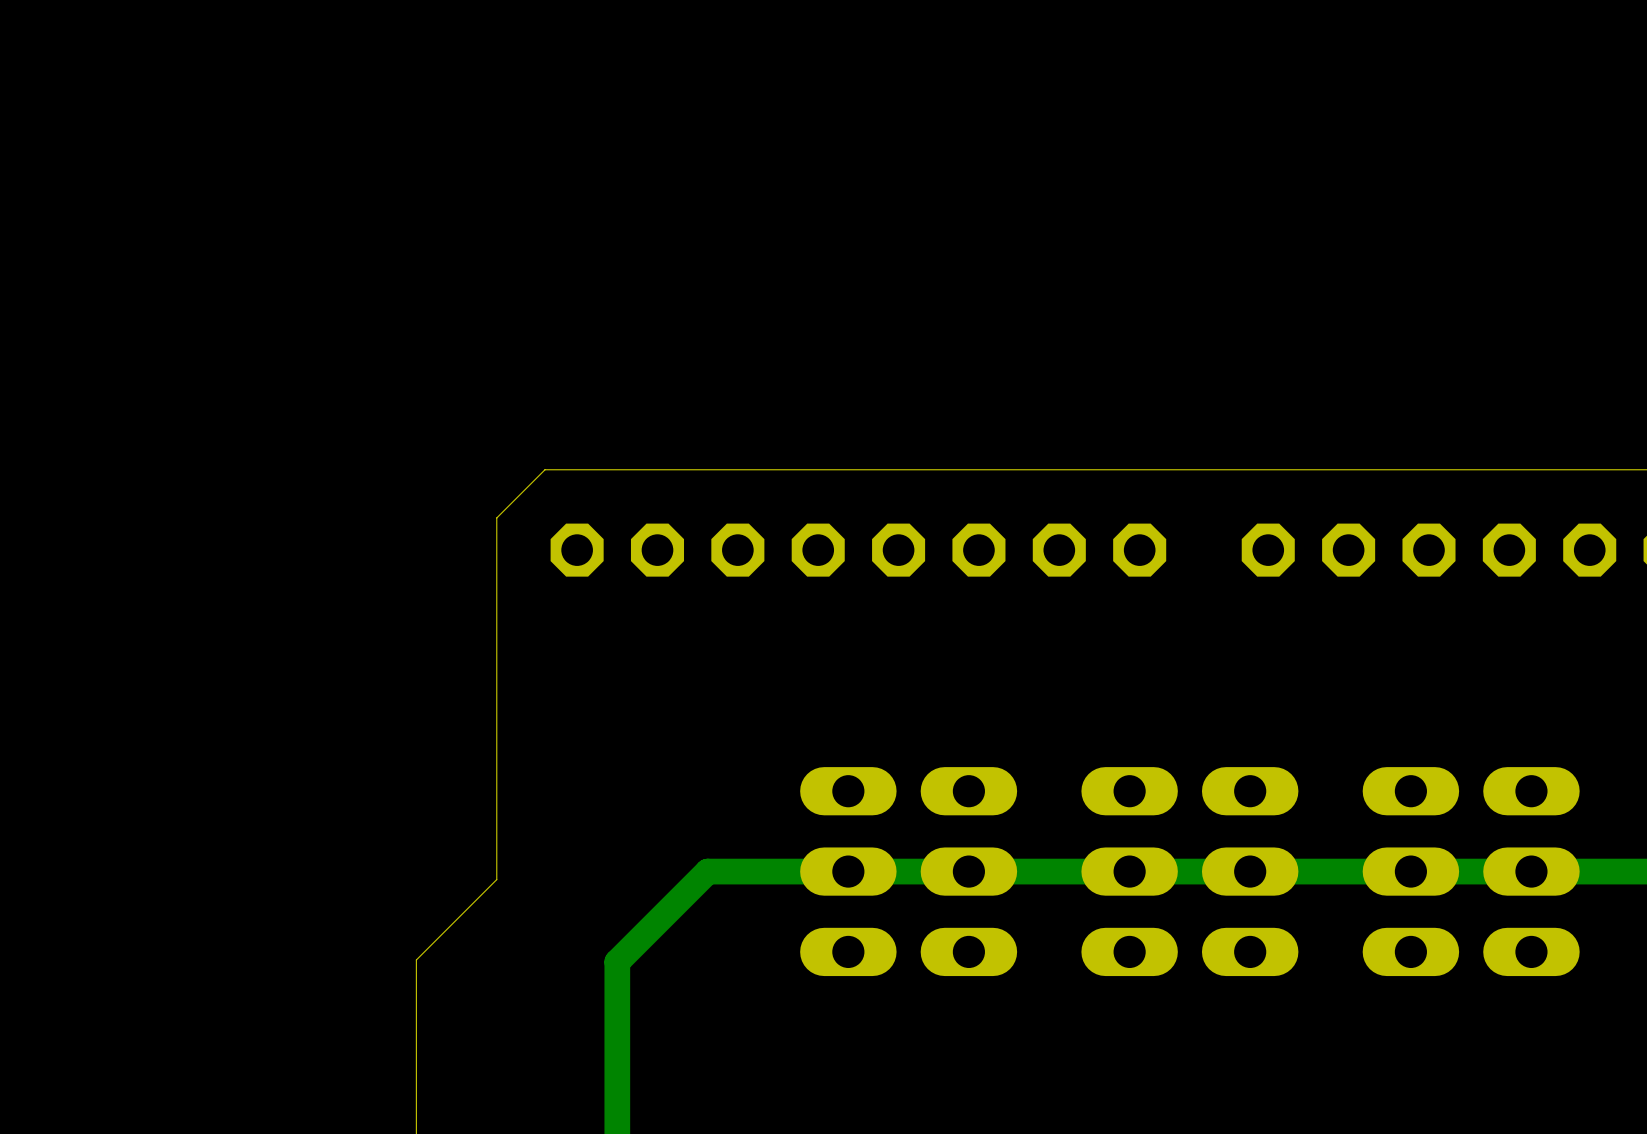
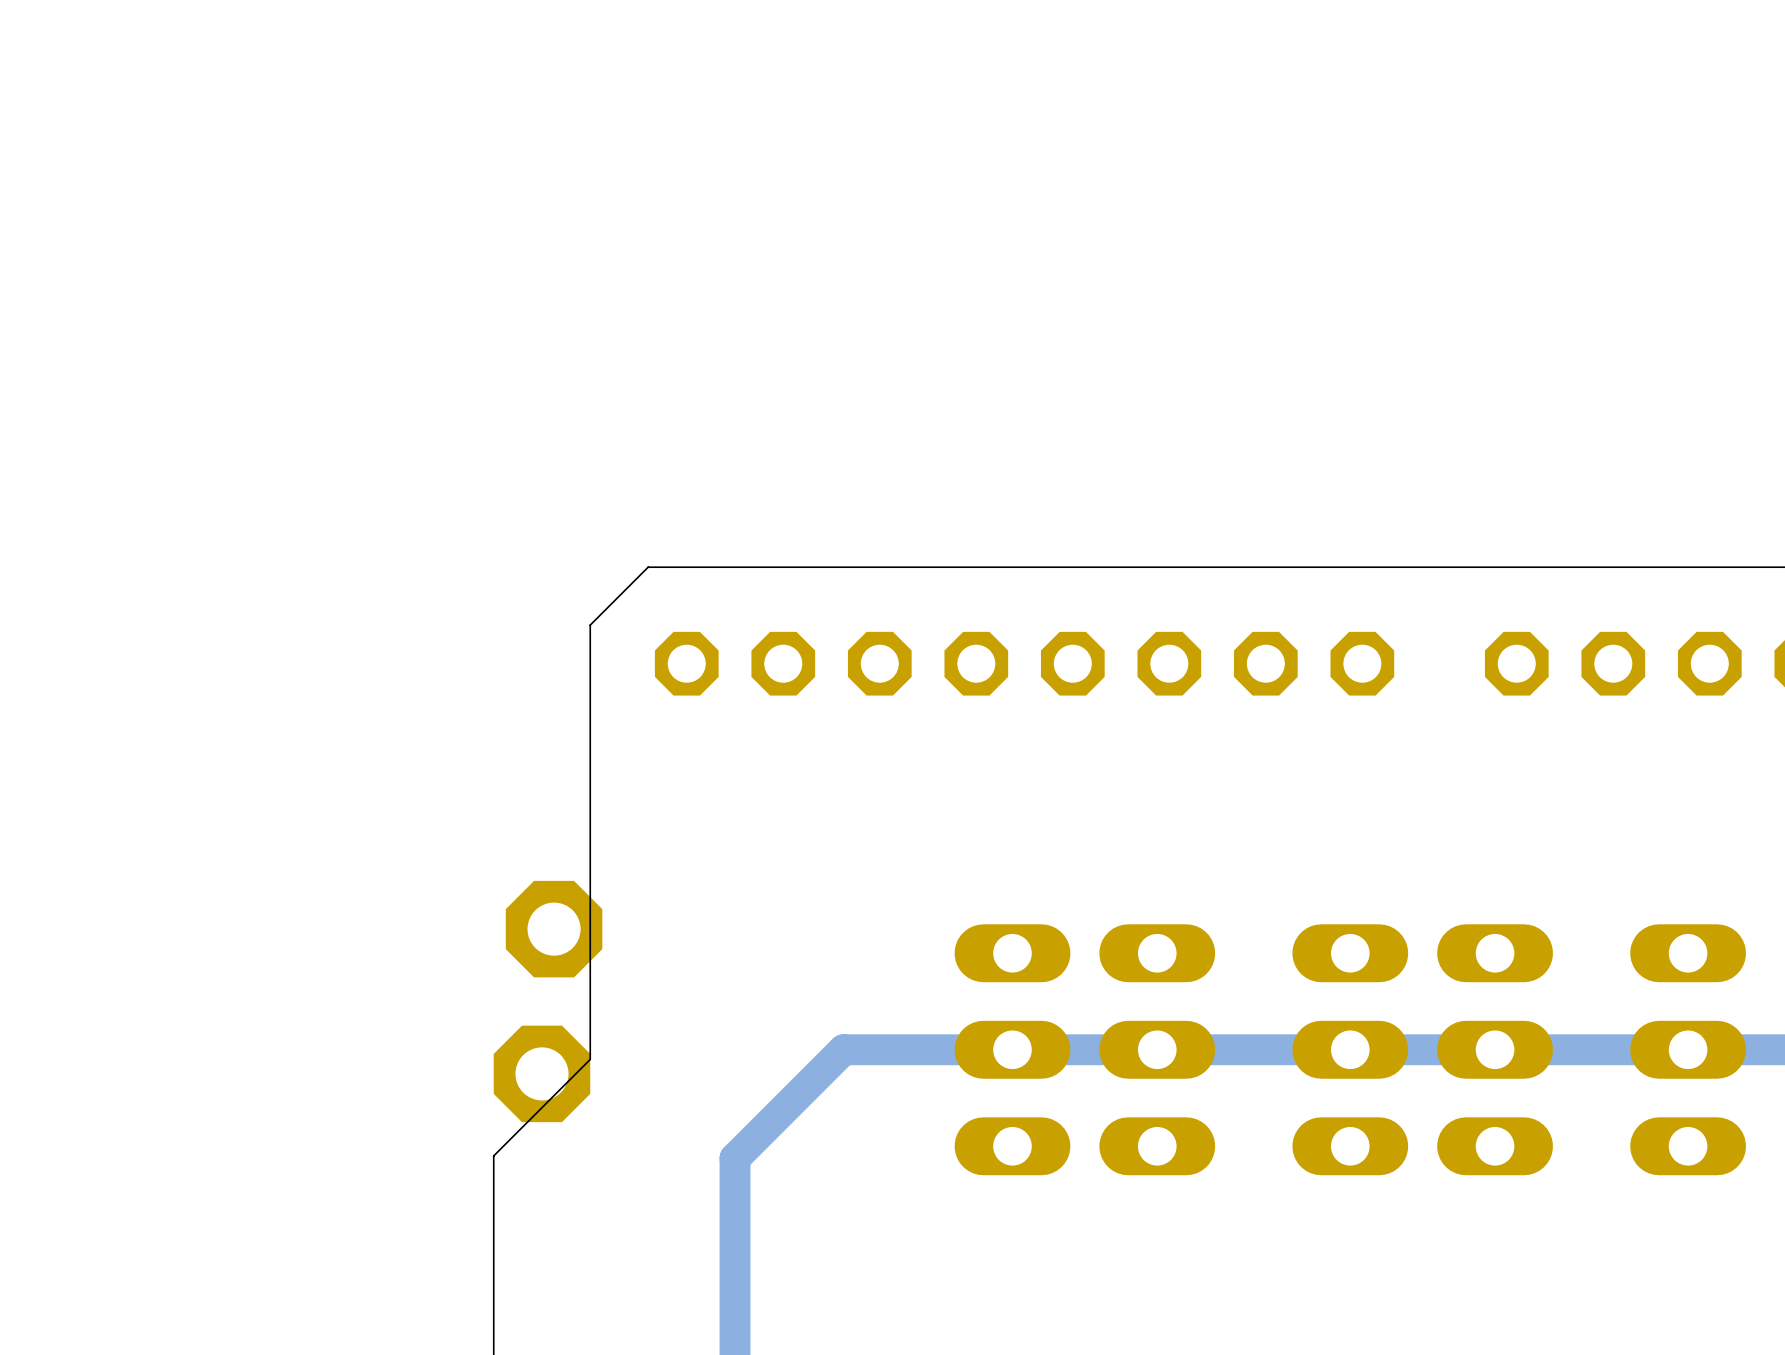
part: none -> (554, 929)
part: none -> (541, 1073)

